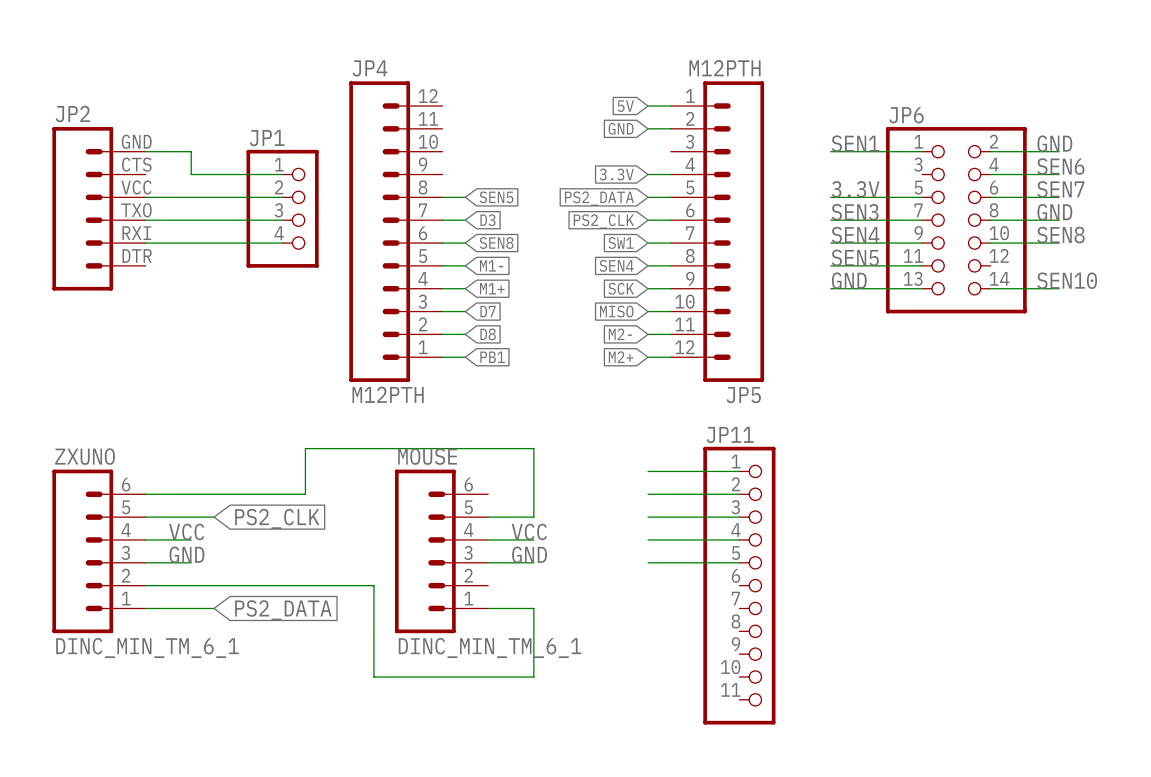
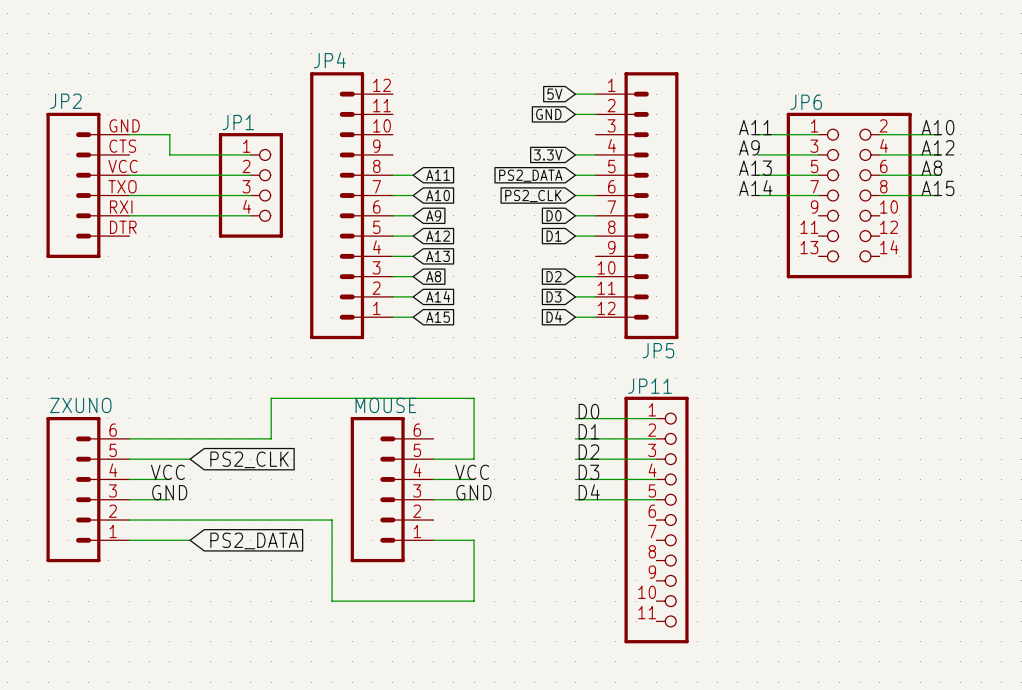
JP5 value: M12PTH (725, 68) -> none
label: SEN1 (855, 143) -> A11 (755, 127)
label: GND (1054, 143) -> A10 (937, 127)
wire: (830, 151) (853, 151) -> none
label: none -> A9 (749, 147)
label: SEN6 (1060, 166) -> A12 (937, 147)
label: 3.3V (855, 189) -> A13 (755, 168)
label: SEN7 (1060, 189) -> A8 (931, 168)
global label: SEN5 (496, 197) -> A11 (438, 175)
wire: (830, 197) (853, 197) -> none
label: SEN3 (855, 212) -> A14 (755, 188)
label: GND (1054, 212) -> A15 (937, 188)
global label: D3 (487, 220) -> A10 (438, 195)
wire: (830, 220) (853, 220) -> none
label: SEN4 (855, 235) -> none
label: SEN8 (1060, 235) -> none
global label: SEN8 (496, 243) -> A9 (433, 215)
global label: SW1 (621, 243) -> D0 (554, 215)
wire: (830, 243) (922, 243) -> none
wire: (990, 243) (1059, 243) -> (757, 154) (818, 154)
label: SEN5 (855, 257) -> none
global label: M1- (491, 265) -> A12 (438, 236)
global label: SEN4 (616, 265) -> D1 (554, 236)
wire: (830, 265) (922, 265) -> none
label: GND (849, 280) -> none
label: SEN10 (1067, 280) -> none
global label: M1+ (492, 288) -> A13 (438, 256)
global label: SCK (621, 288) -> none
wire: (648, 288) (670, 288) -> none
wire: (830, 288) (922, 288) -> none
wire: (990, 288) (1059, 288) -> none
global label: D7 (488, 311) -> A8 (433, 276)
global label: MISO (616, 311) -> D2 (554, 276)
global label: D8 (488, 334) -> A14 (438, 296)
global label: M2- (620, 334) -> D3 (554, 296)
global label: PB1 (492, 357) -> A15 (438, 317)
global label: M2+ (621, 357) -> D4 (554, 316)
JP4 value: M12PTH (388, 394) -> none
label: none -> D0 (588, 411)
label: none -> D1 (588, 431)
label: none -> D2 (588, 452)
label: none -> D3 (588, 472)
label: none -> D4 (589, 492)
ZXUNO value: DINC_MIN_TM_6_1 (147, 647) -> none
MOUSE value: DINC_MIN_TM_6_1 (490, 647) -> none

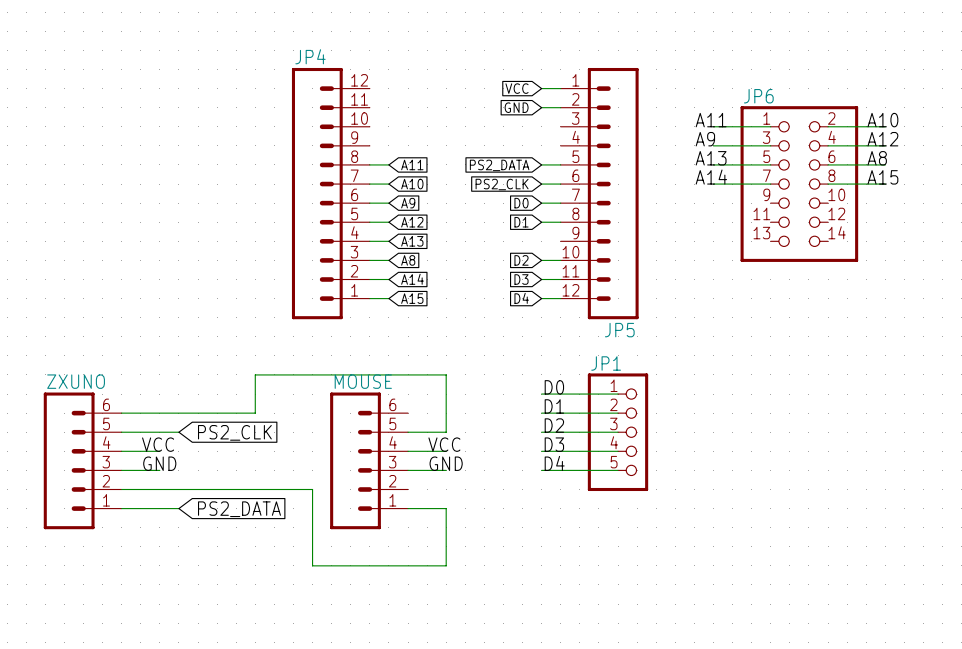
global label: 5V (554, 94) -> VCC (517, 88)
JP1 symbol: [218, 133, 283, 238] -> [587, 373, 649, 492]
wire: (129, 134) (169, 134) (169, 154) (250, 154) -> none
global label: 3.3V (548, 154) -> none
wire: (575, 154) (595, 154) -> none
wire: (129, 175) (250, 175) -> none
JP2: (87, 185) -> none
wire: (129, 195) (250, 195) -> none
wire: (129, 215) (250, 215) -> none
JP11: (656, 520) -> none

